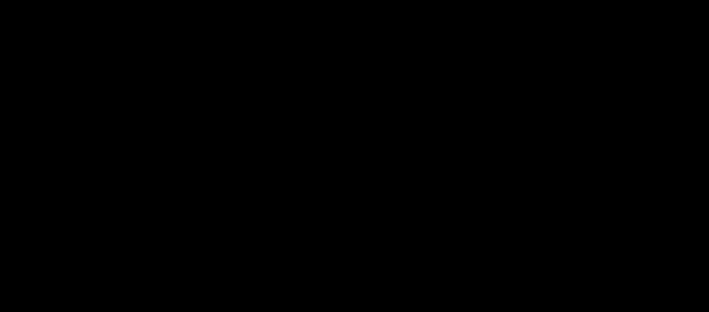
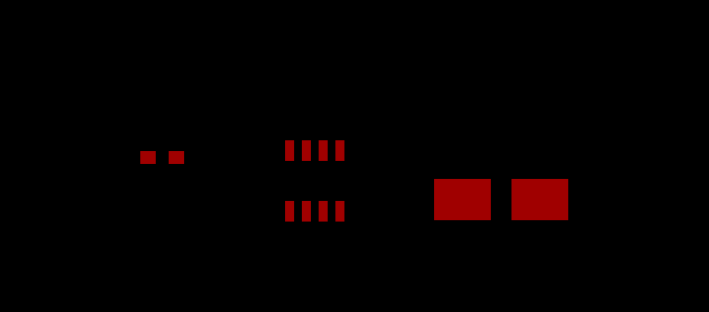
part: none -> (162, 157)
part: none -> (314, 180)
part: none -> (501, 199)

